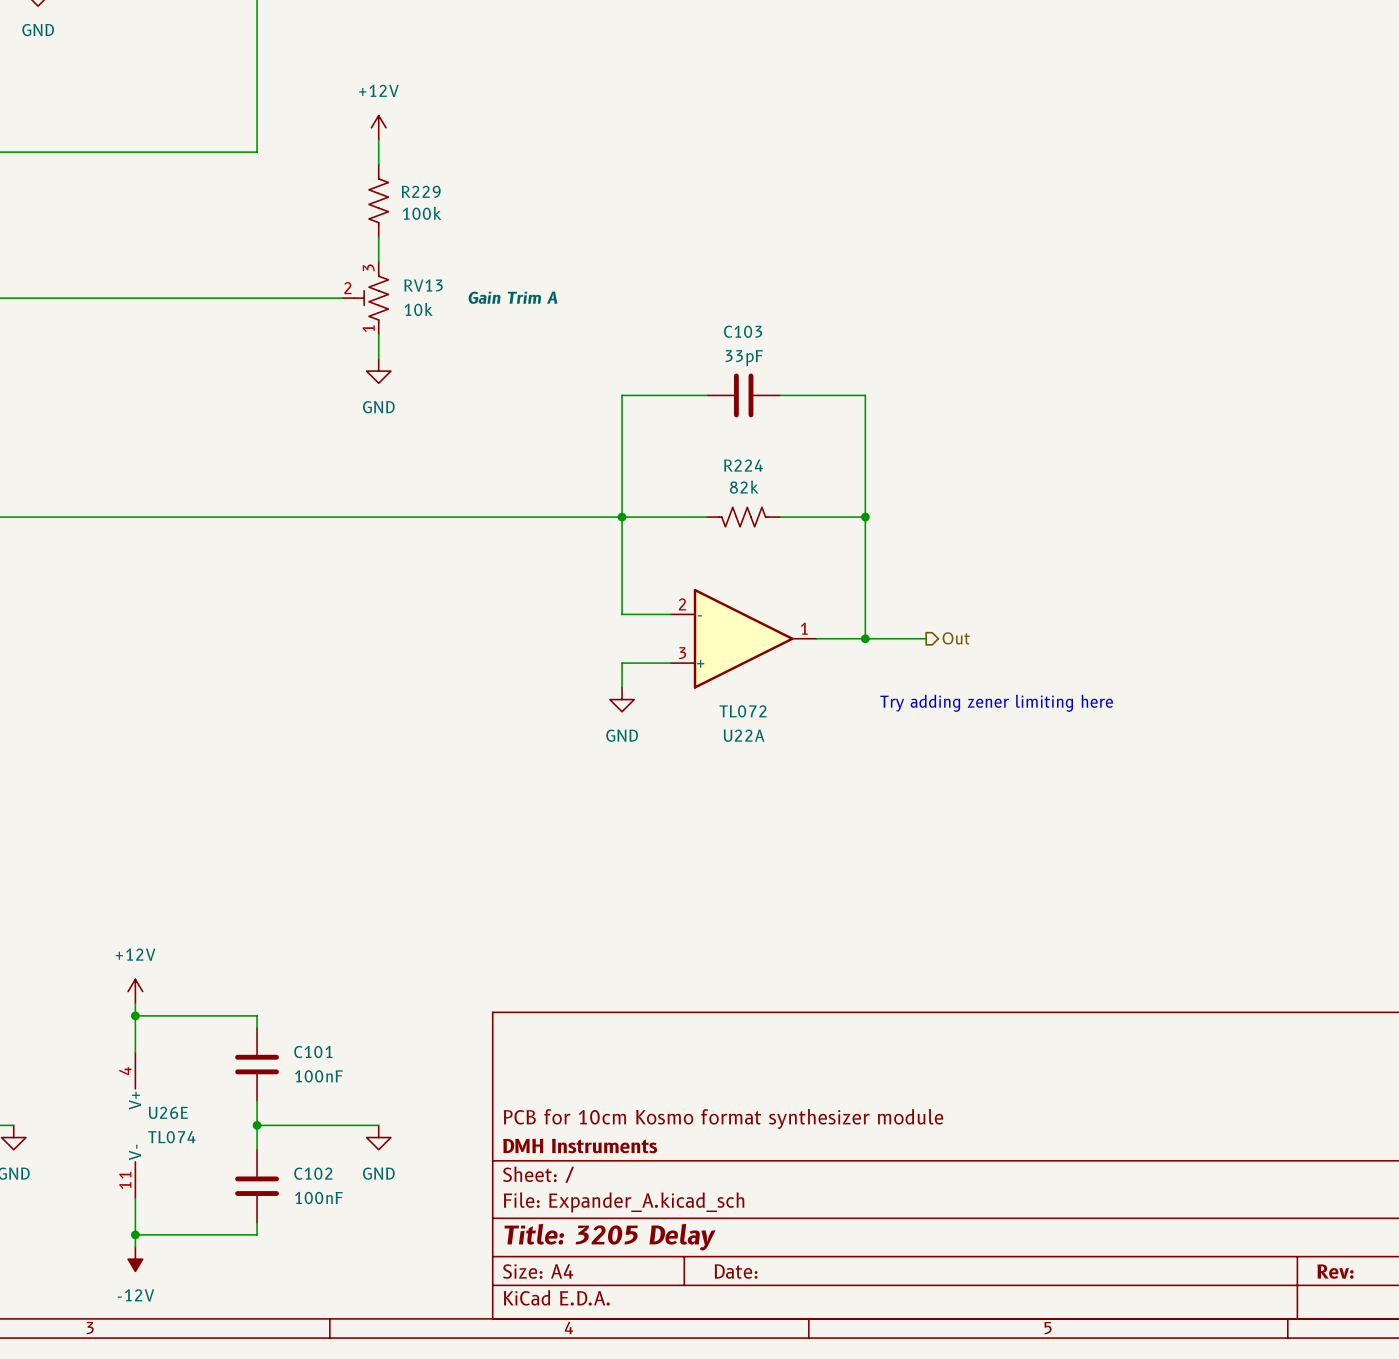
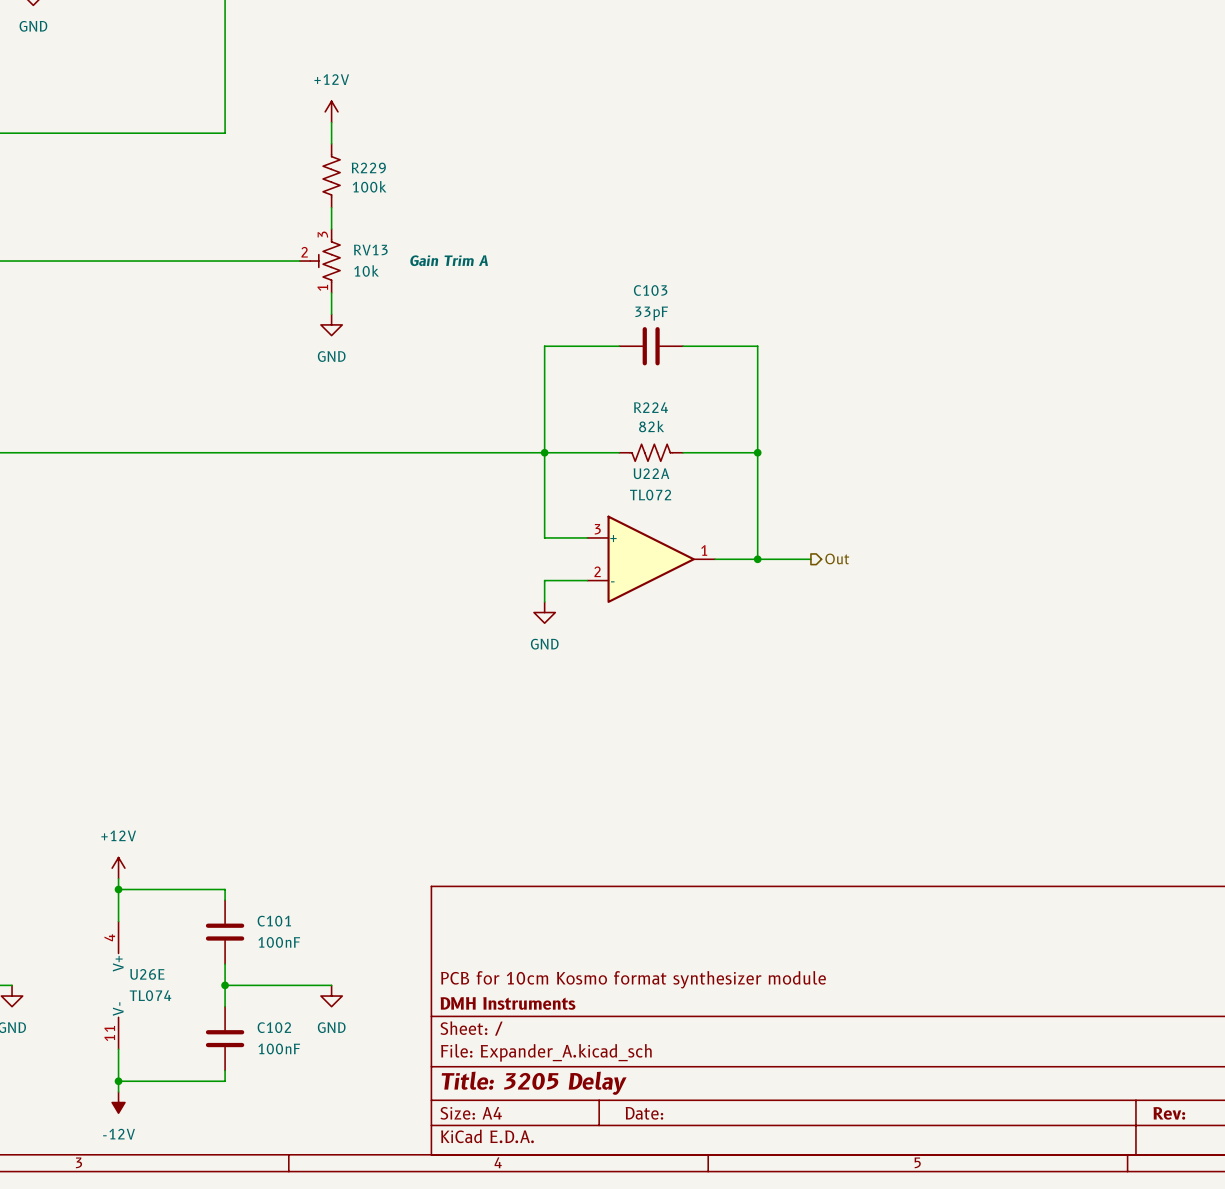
U22A flip: as is (743, 638) -> up-down (651, 559)
text: Try adding zener limiting here (996, 703) -> none

